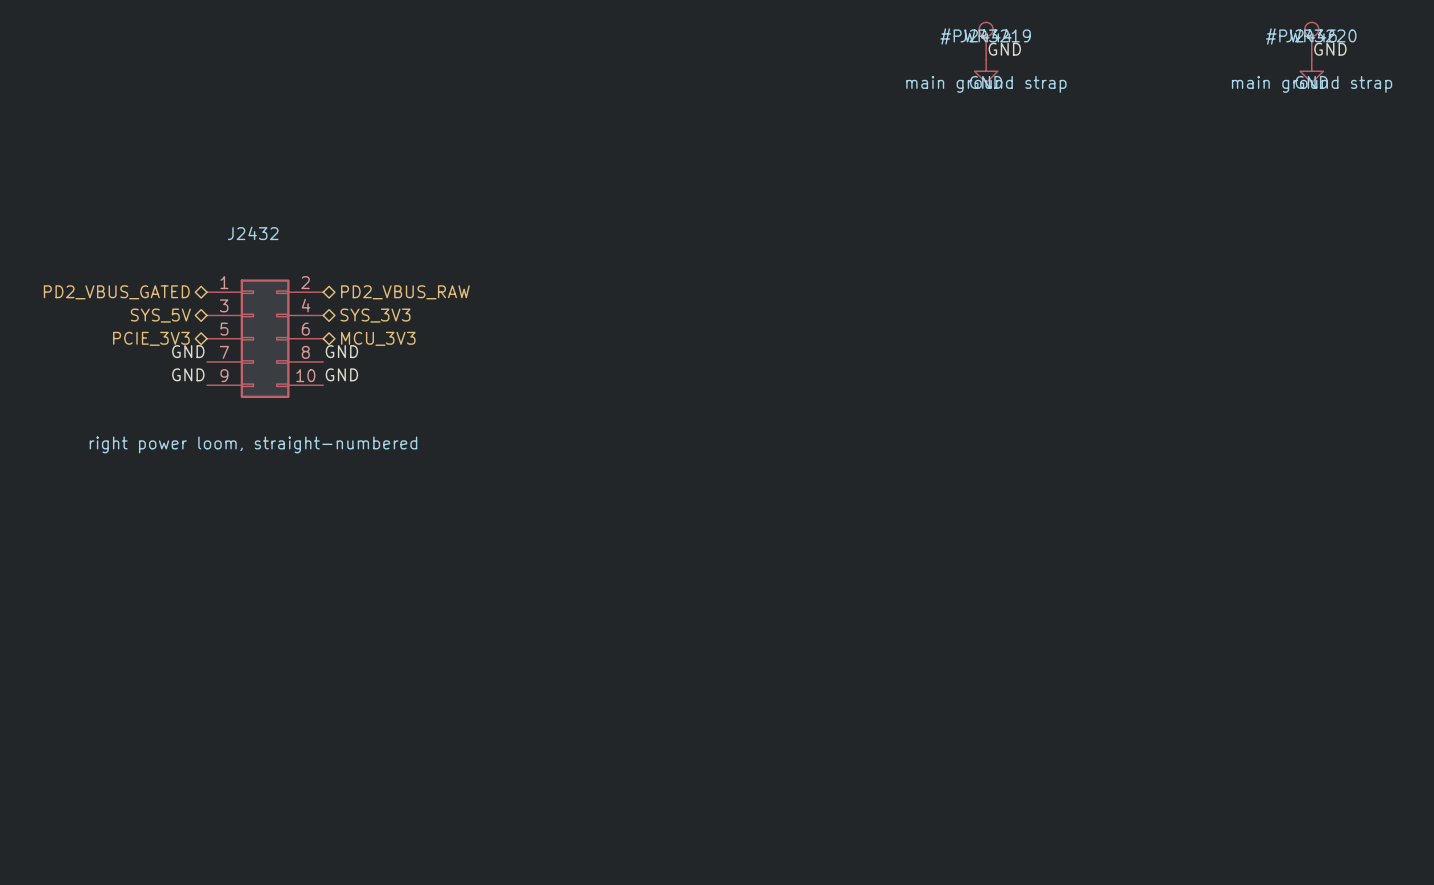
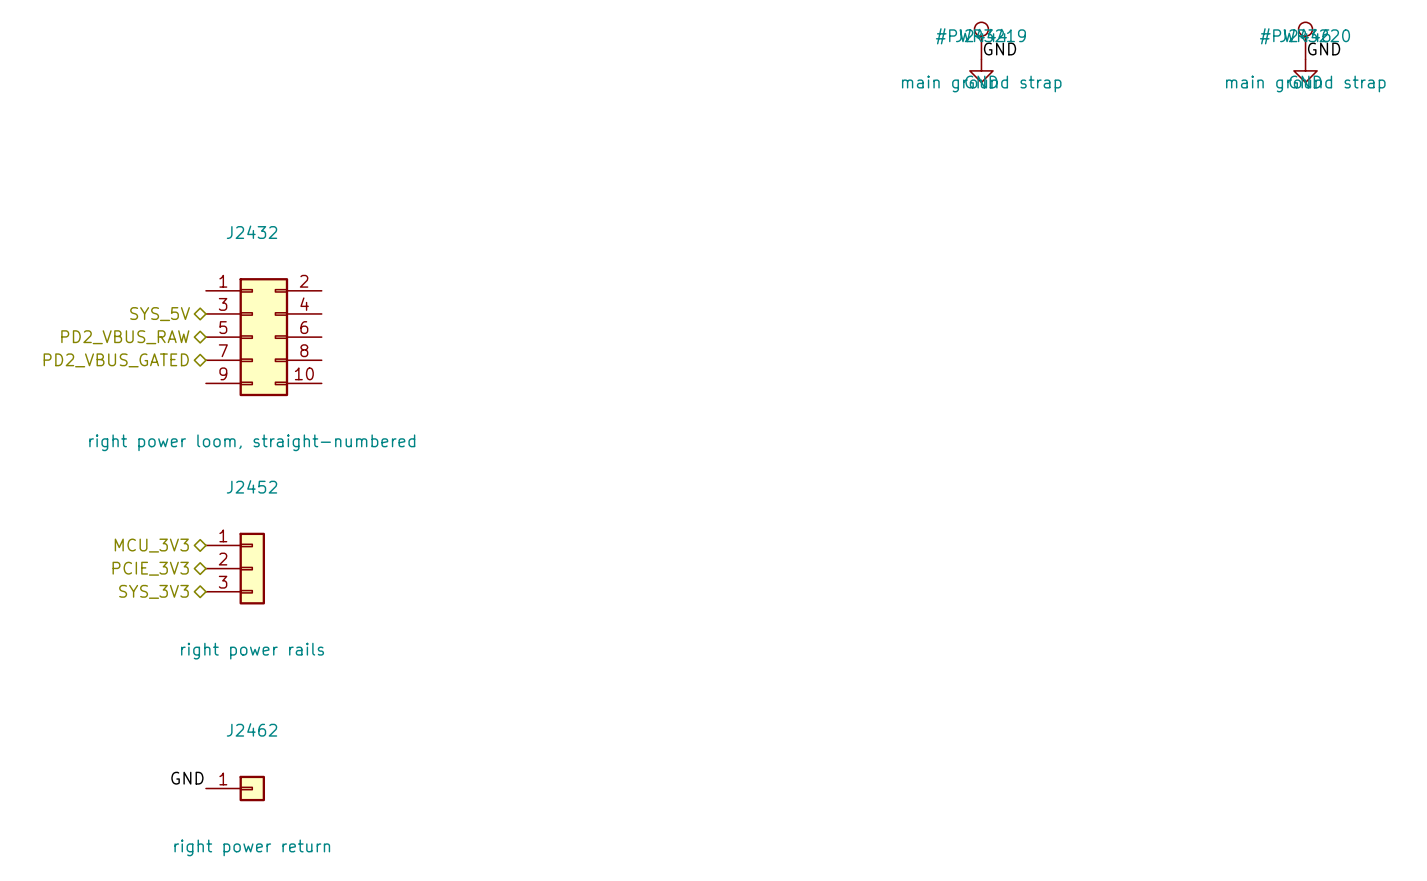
hierarchical label position: PD2_VBUS_GATED (116, 292) -> PD2_VBUS_GATED (116, 360)
hierarchical label: PD2_VBUS_RAW (405, 292) -> none
hierarchical label: SYS_3V3 (375, 315) -> none
hierarchical label: PCIE_3V3 (151, 338) -> PD2_VBUS_RAW (125, 337)
hierarchical label: MCU_3V3 (378, 338) -> none
label: GND (188, 351) -> none
label: GND (341, 351) -> none
label: GND (188, 374) -> none
label: GND (341, 374) -> none
hierarchical label: none -> MCU_3V3 (151, 545)
hierarchical label: none -> PCIE_3V3 (150, 568)
J2452: none -> right power rails (235, 568)
hierarchical label: none -> SYS_3V3 (153, 591)
label: none -> GND (187, 778)
J2462: none -> right power return (235, 788)

